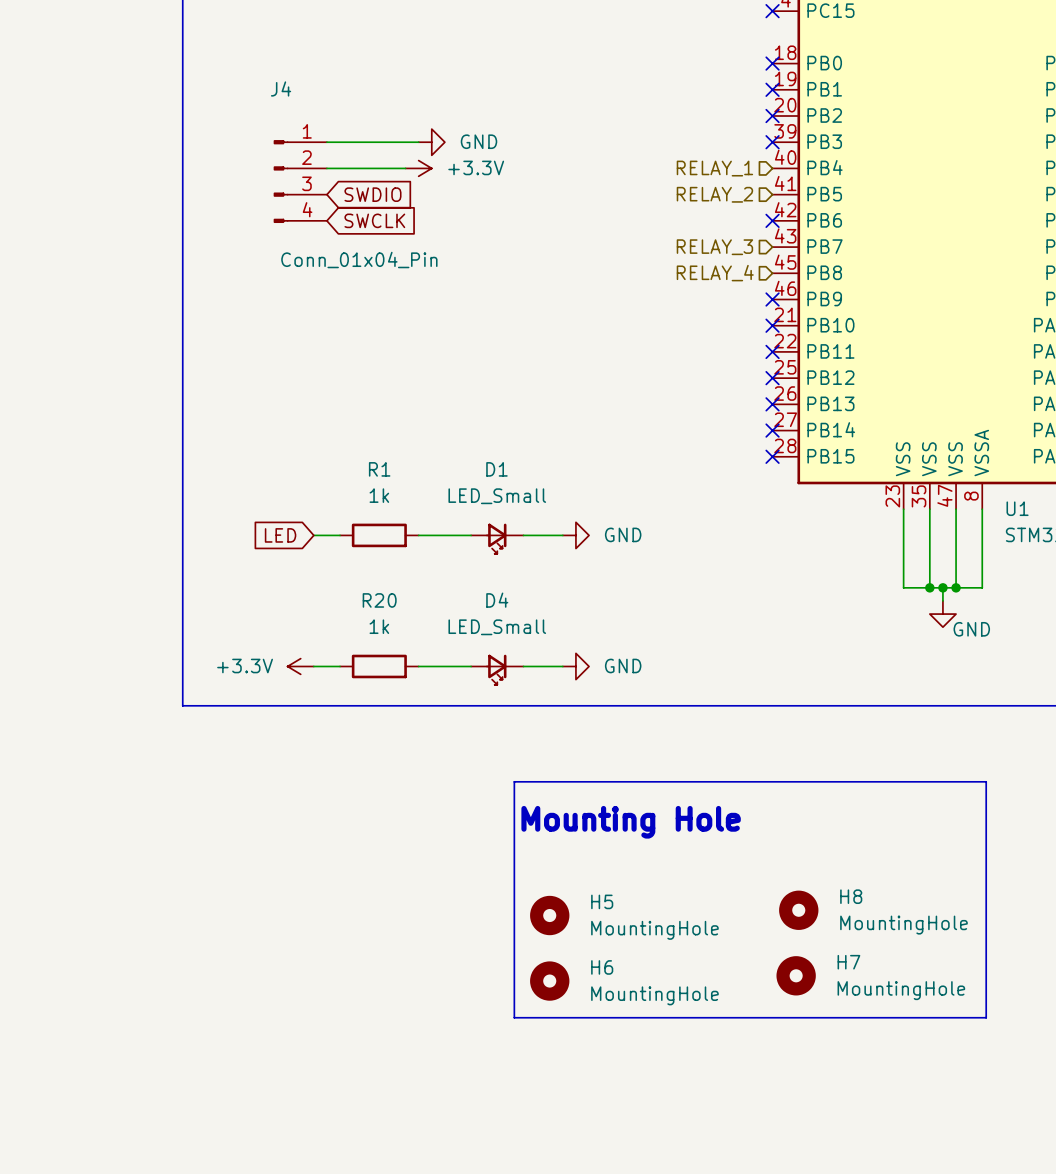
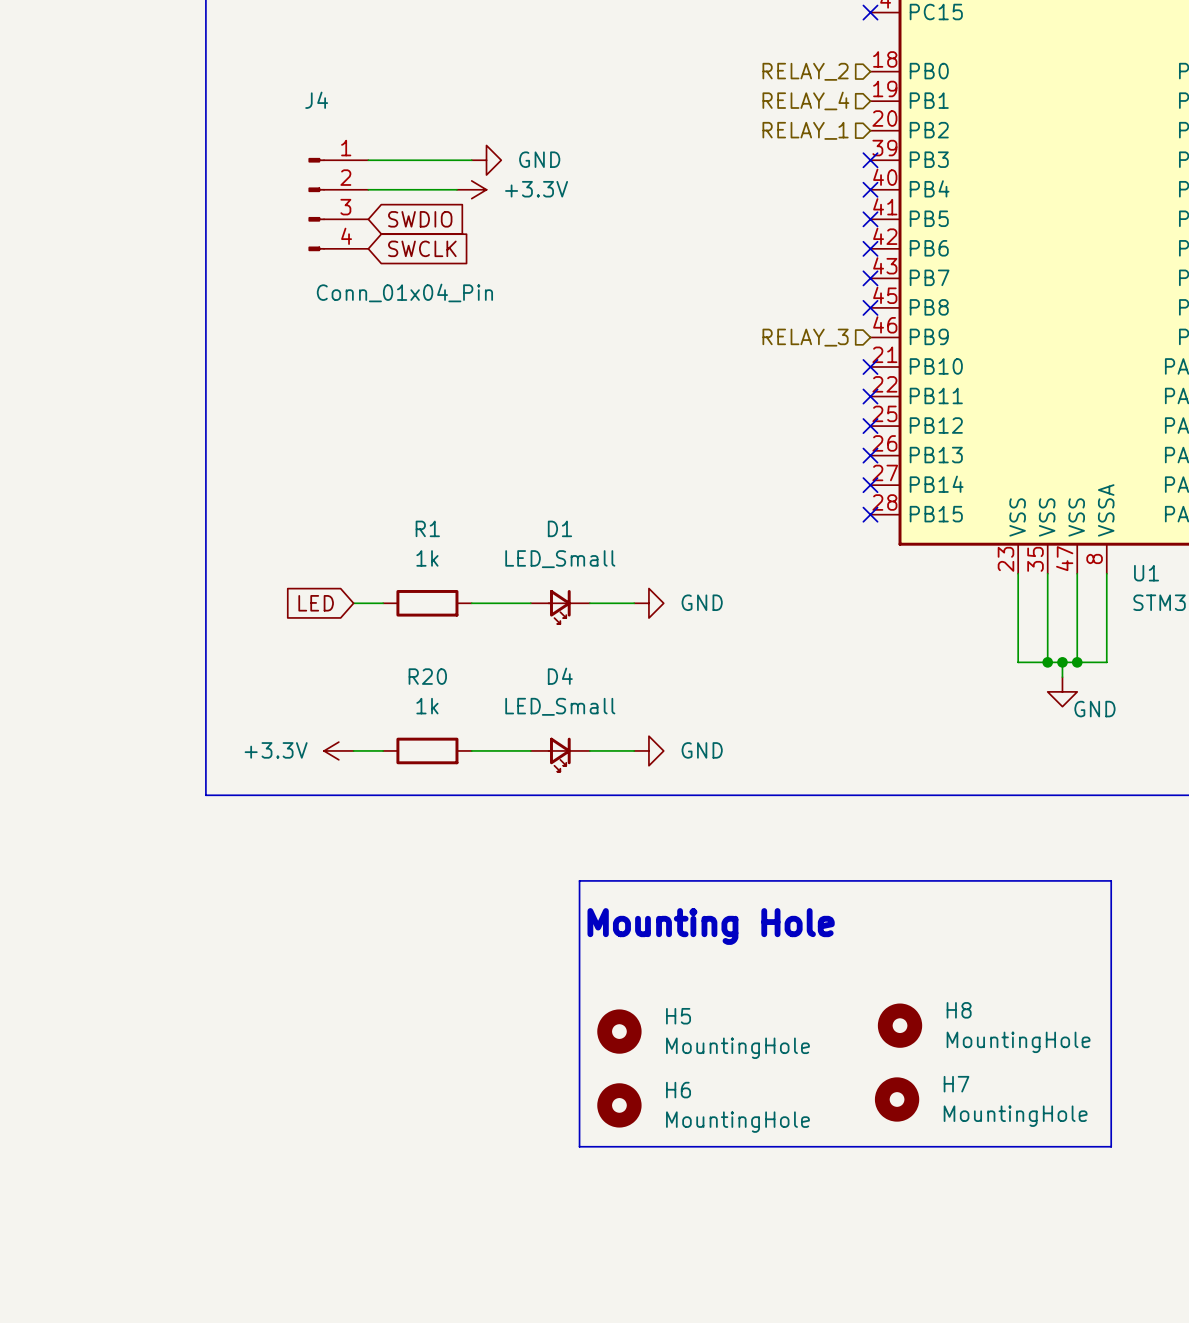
no-connect mark: (772, 63) -> none
no-connect mark: (772, 89) -> none
no-connect mark: (772, 116) -> none
hierarchical label position: RELAY_1 (714, 168) -> RELAY_1 (805, 130)
no-connect mark: none -> (870, 189)
hierarchical label position: RELAY_2 (714, 194) -> RELAY_2 (805, 71)
no-connect mark: none -> (870, 219)
hierarchical label position: RELAY_3 (714, 247) -> RELAY_3 (805, 337)
no-connect mark: none -> (870, 278)
hierarchical label position: RELAY_4 (715, 273) -> RELAY_4 (805, 100)
no-connect mark: none -> (870, 307)
no-connect mark: (772, 299) -> none

